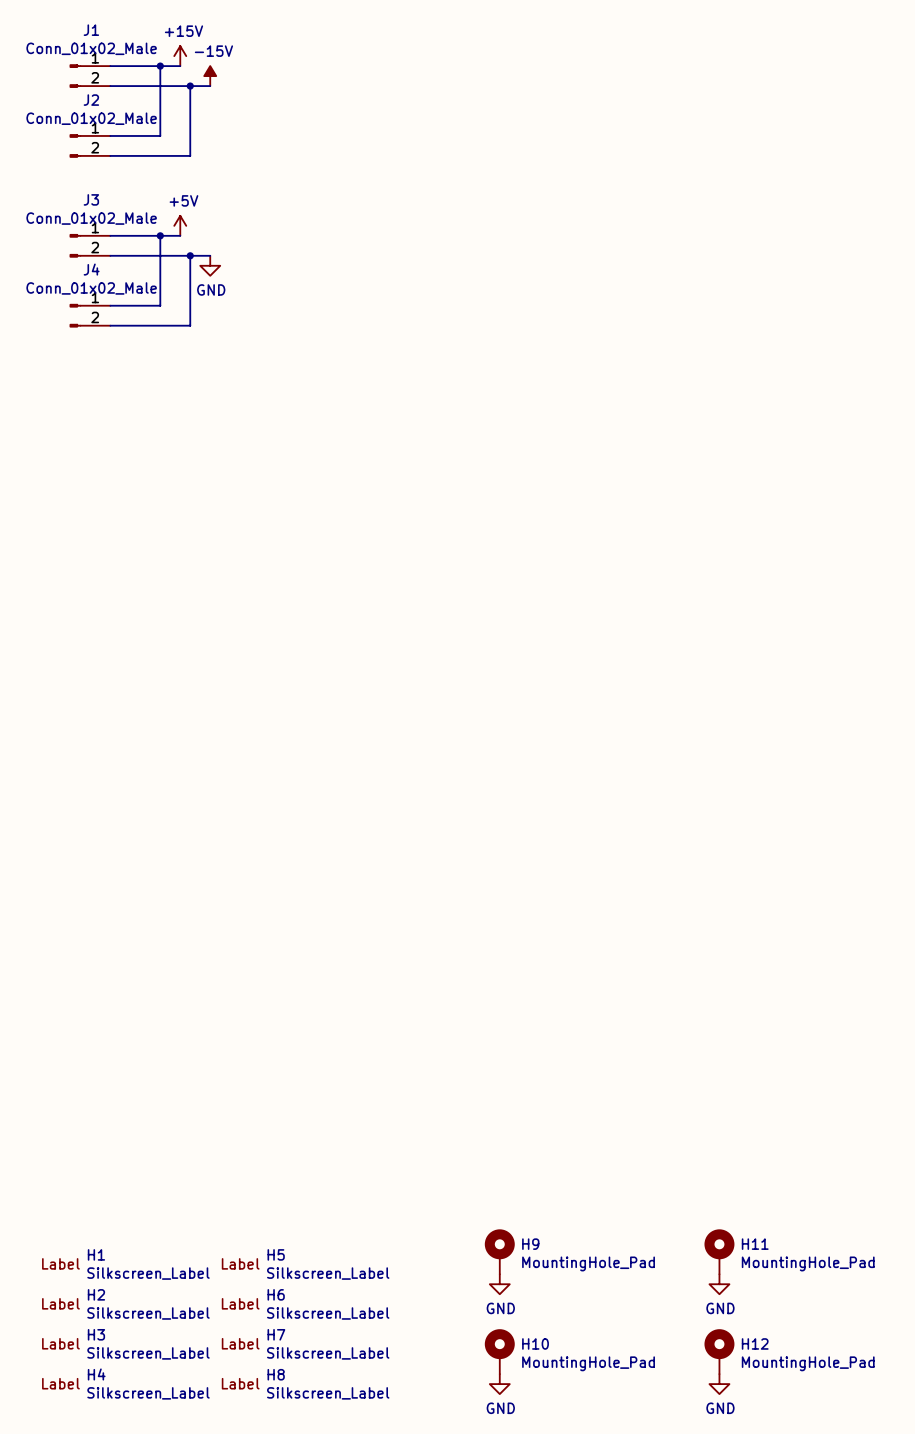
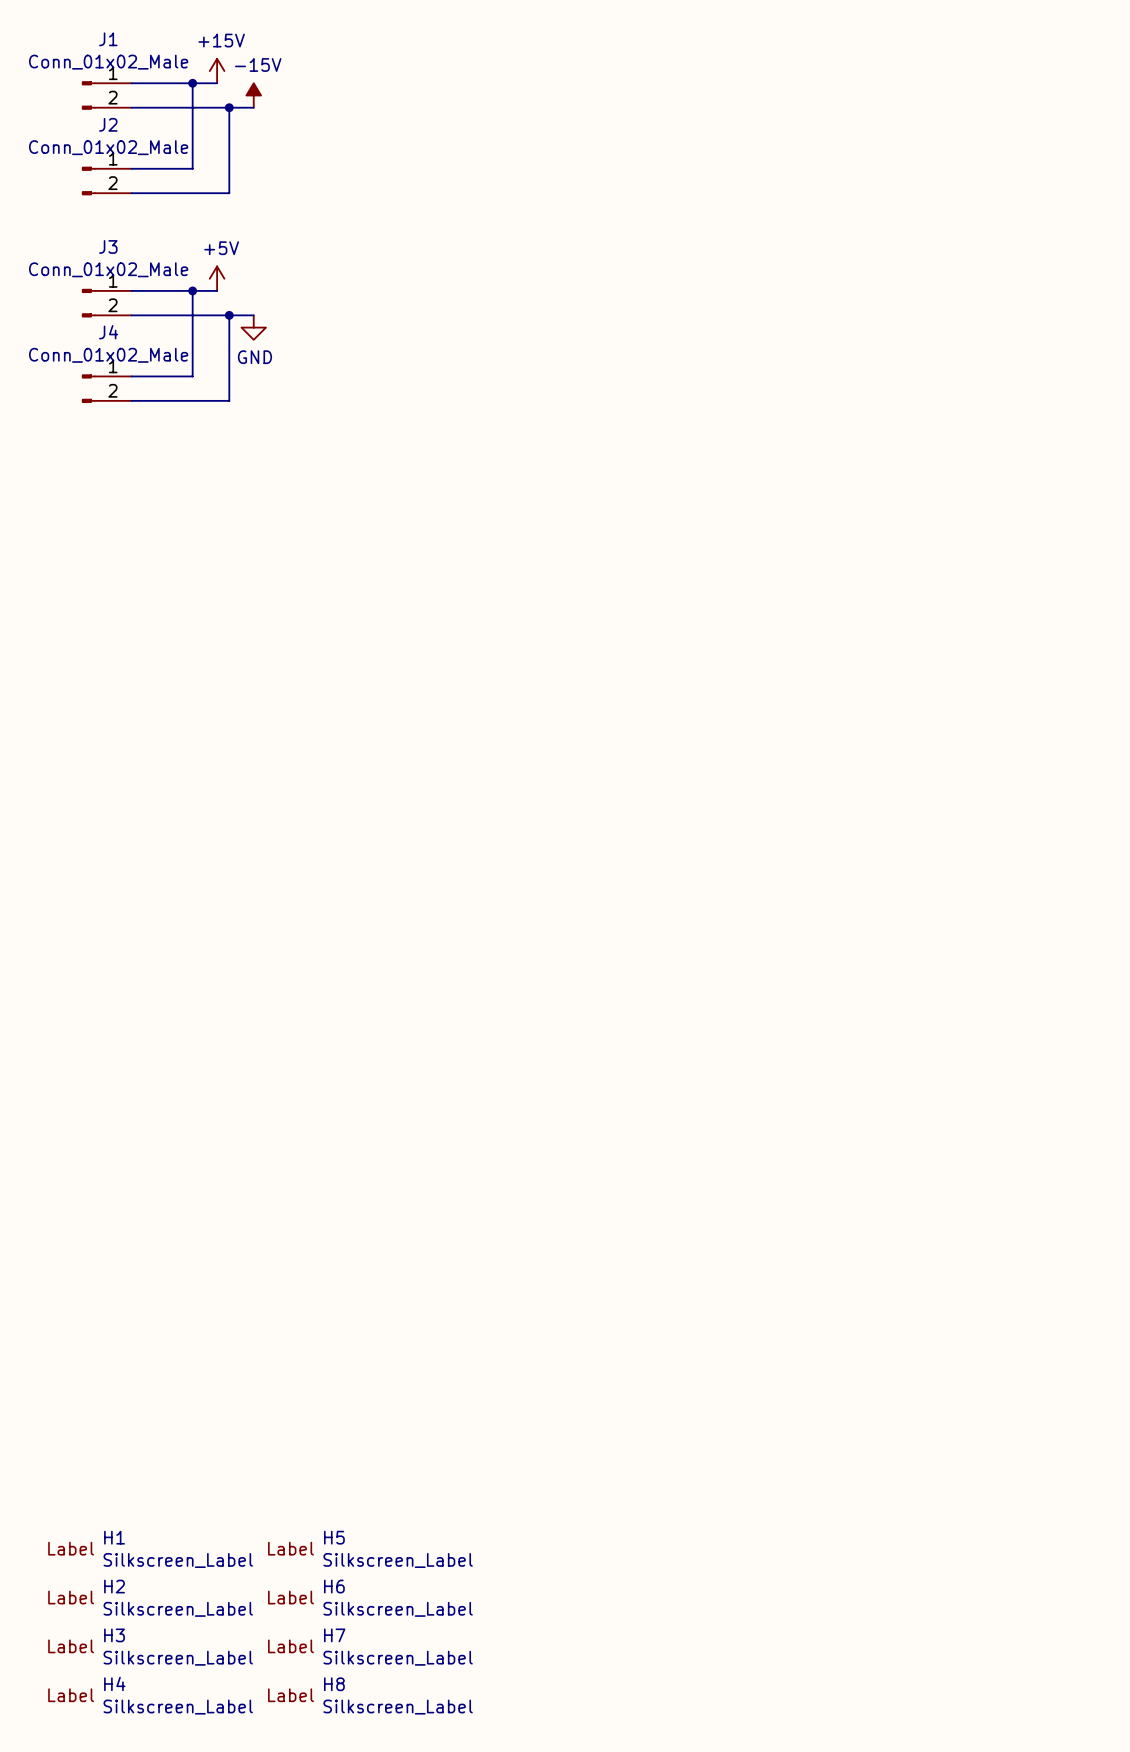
H9: MountingHole_Pad (499, 1251) -> none
H11: MountingHole_Pad (719, 1251) -> none
power symbol: GND (499, 1284) -> none
power symbol: GND (719, 1284) -> none
H10: MountingHole_Pad (499, 1351) -> none
H12: MountingHole_Pad (719, 1351) -> none
power symbol: GND (499, 1384) -> none
power symbol: GND (719, 1384) -> none

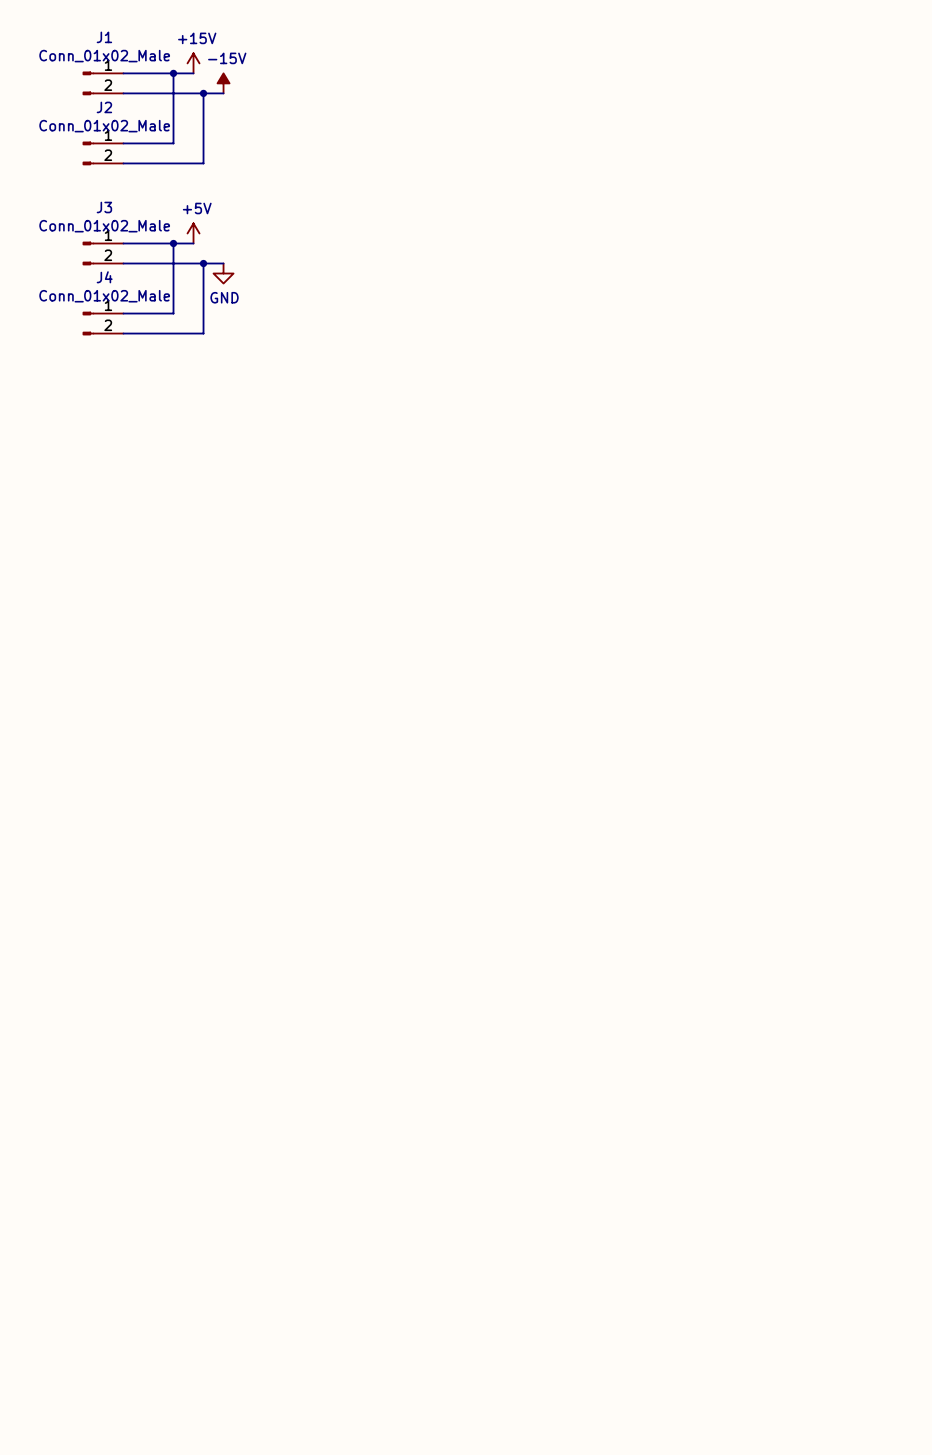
H1: Silkscreen_Label (150, 1549) -> none
H5: Silkscreen_Label (370, 1549) -> none
H2: Silkscreen_Label (150, 1598) -> none
H6: Silkscreen_Label (370, 1598) -> none
H3: Silkscreen_Label (150, 1647) -> none
H7: Silkscreen_Label (370, 1647) -> none
H4: Silkscreen_Label (150, 1695) -> none
H8: Silkscreen_Label (370, 1695) -> none

